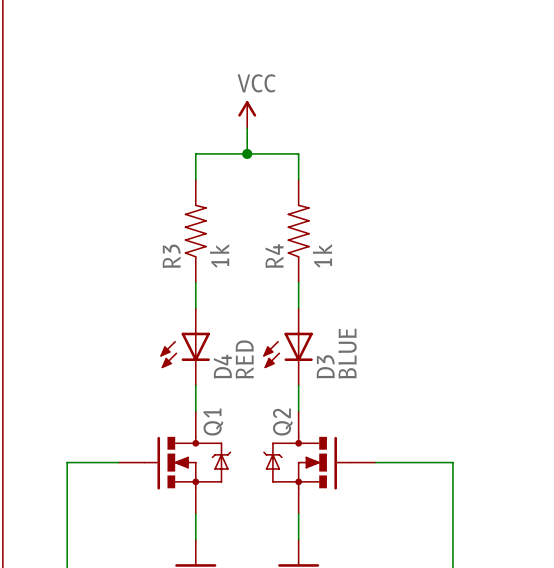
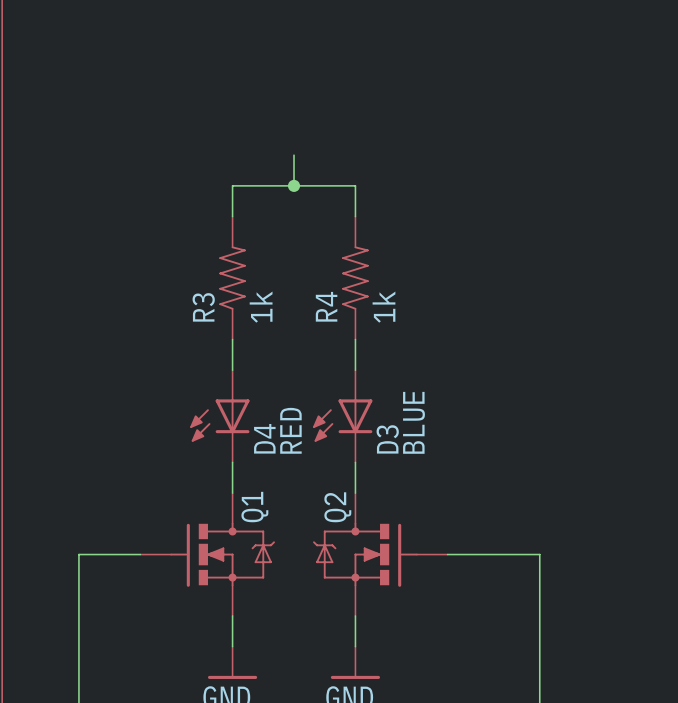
power symbol: VCC (247, 114) -> none

